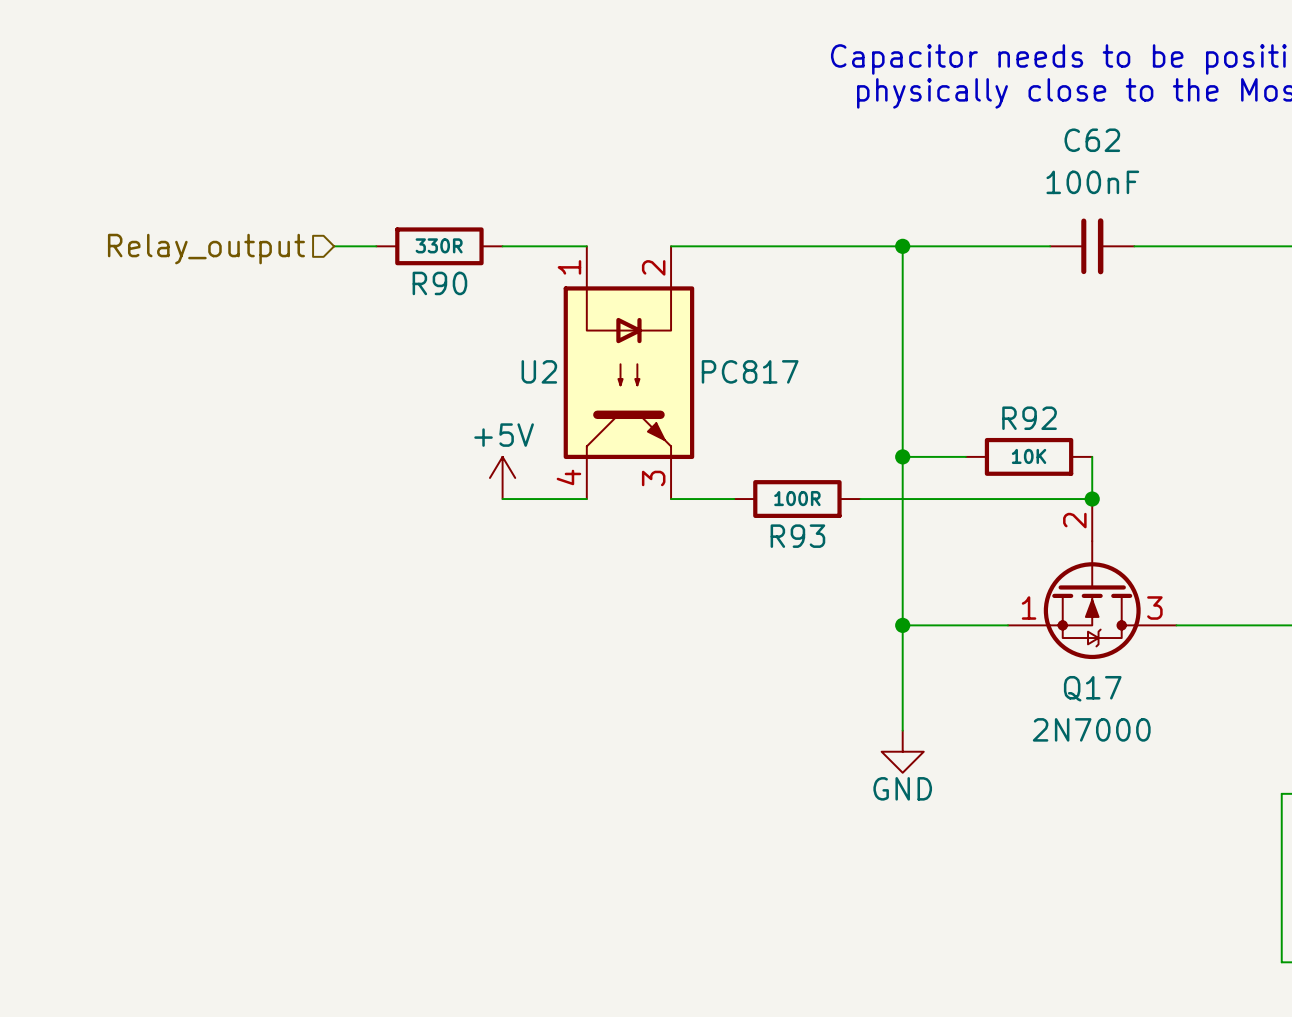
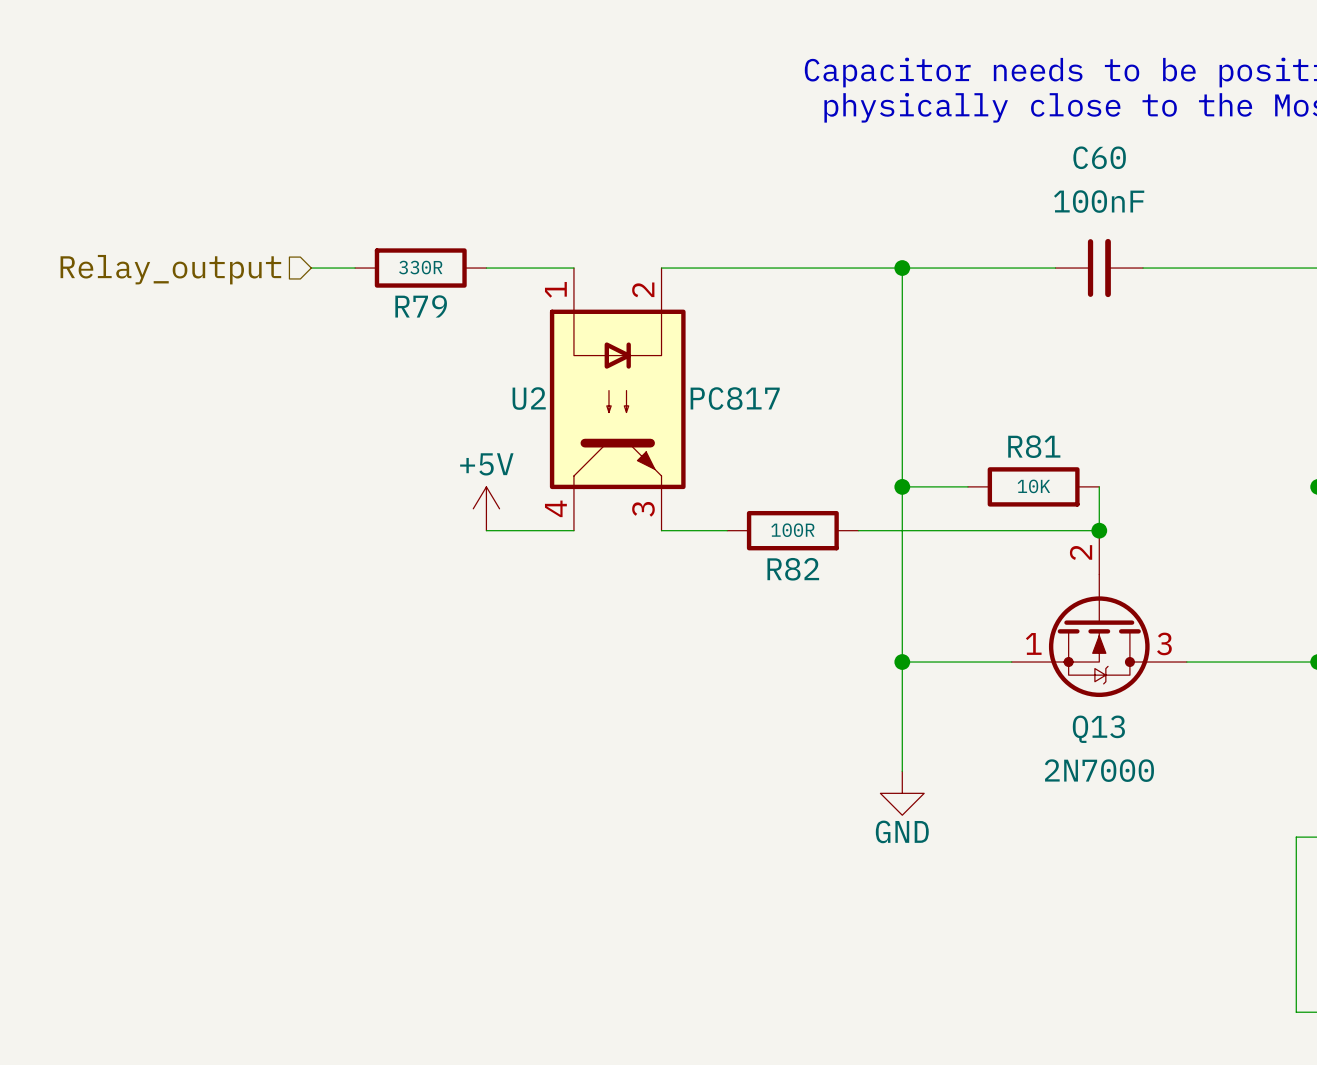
C62 name: C62 (1092, 140) -> C60 (1099, 157)
R90 name: R90 (439, 283) -> R79 (421, 306)
R92 name: R92 (1029, 418) -> R81 (1034, 446)
R93 name: R93 (797, 536) -> R82 (793, 569)
Q17 name: Q17 (1092, 688) -> Q13 (1098, 729)

